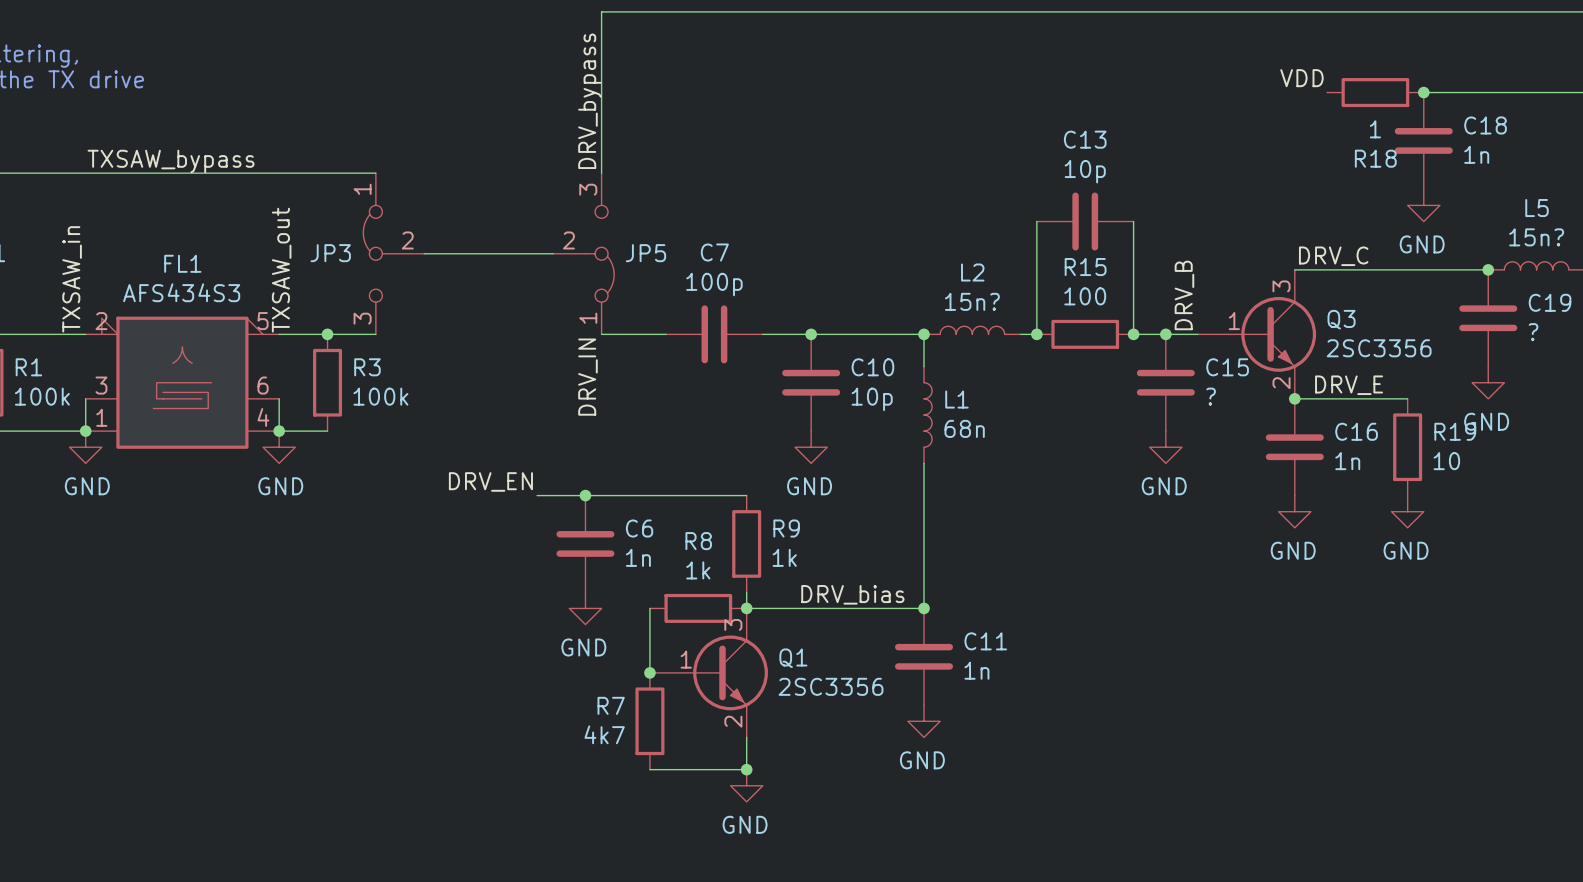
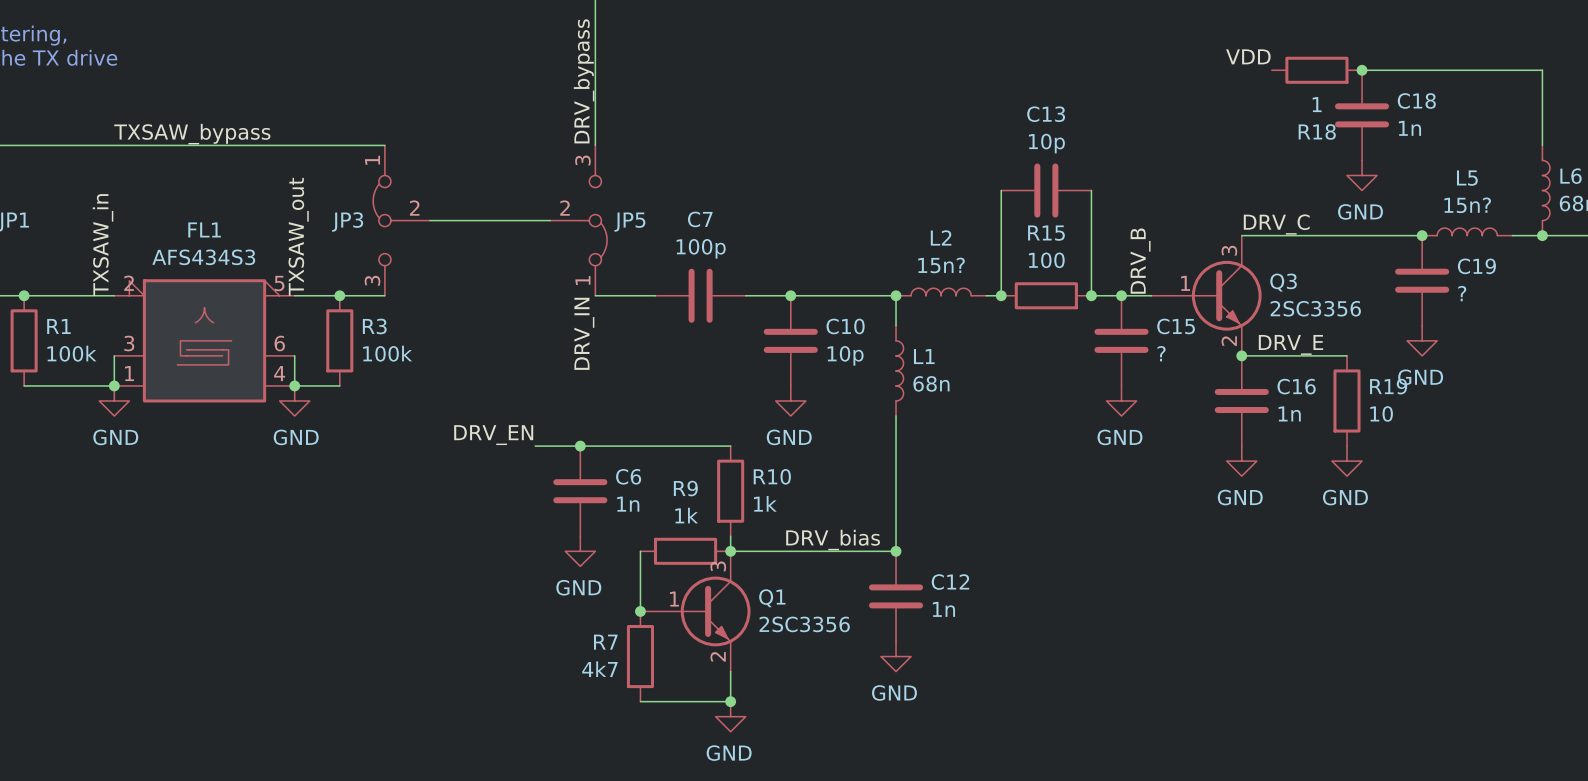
R9 name: R9 (786, 528) -> R10 (772, 476)
R8 name: R8 (698, 541) -> R9 (685, 488)
C11 name: C11 (985, 641) -> C12 (950, 582)

